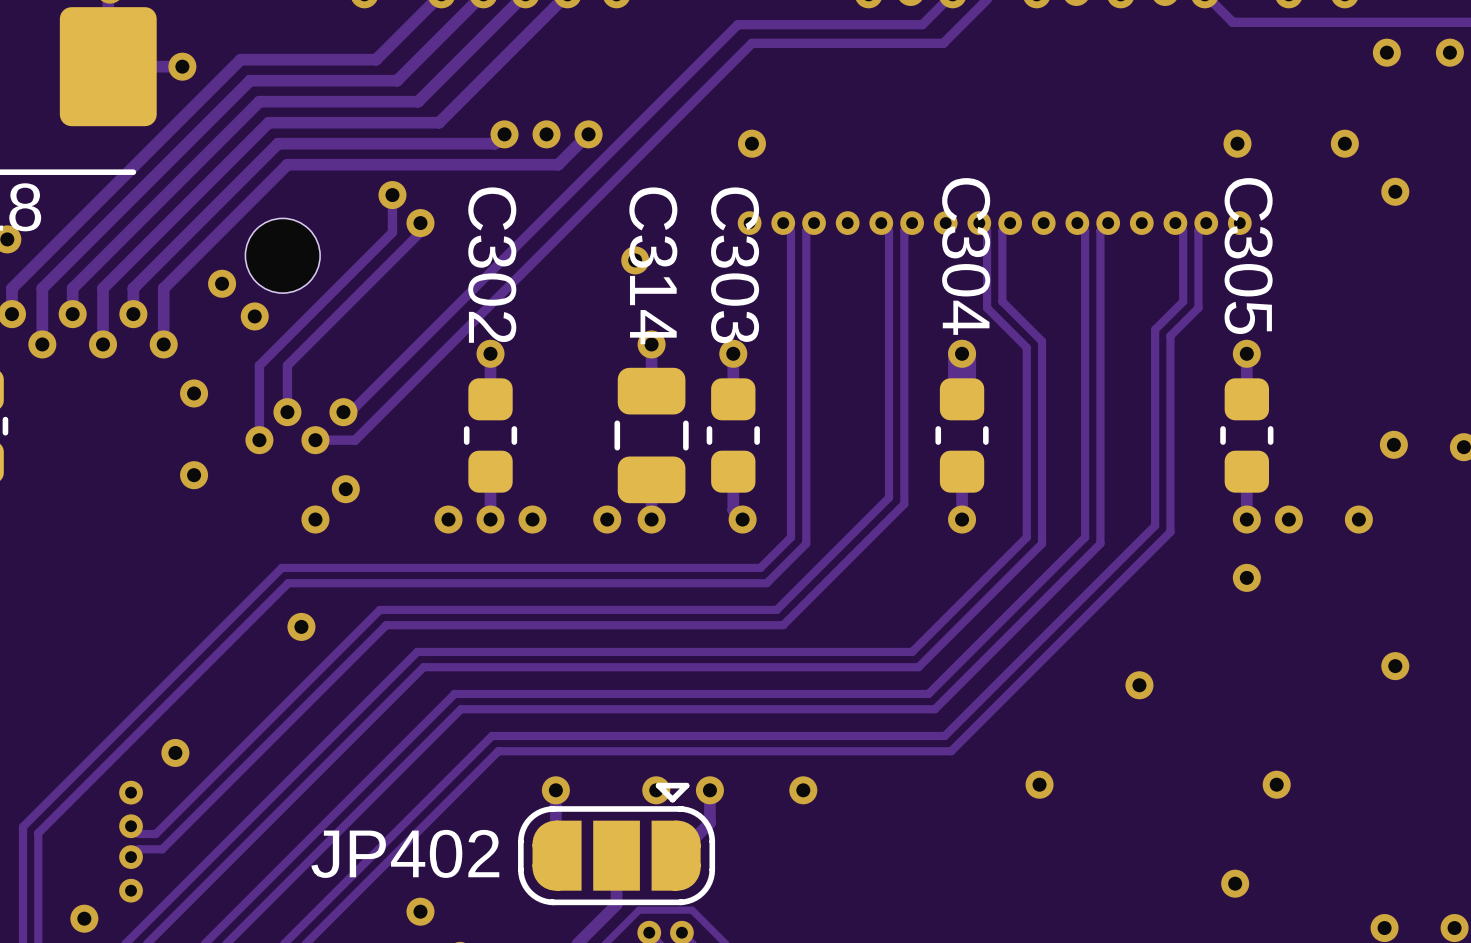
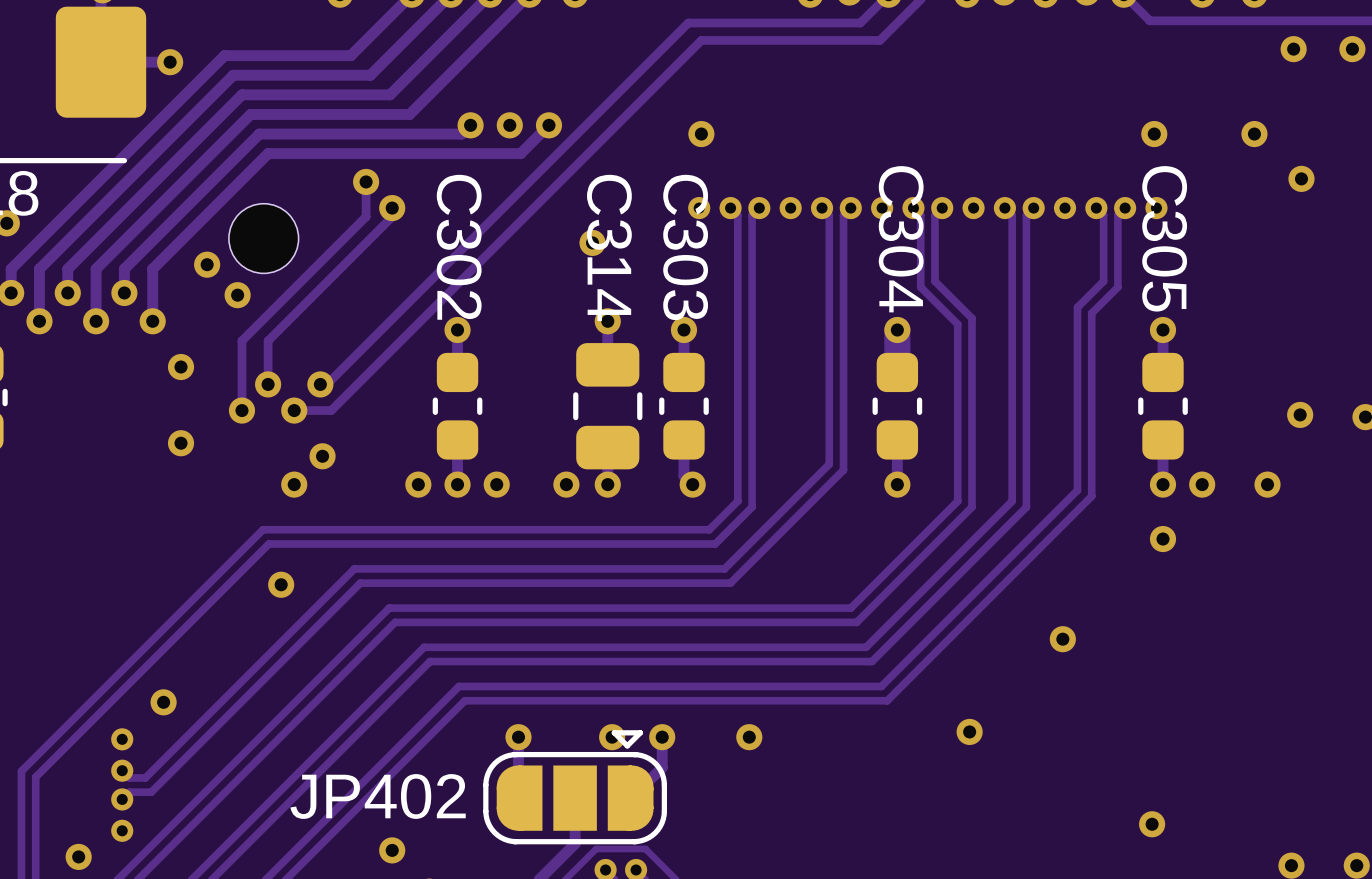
via: (1395, 666) -> none
via: (1276, 784) -> none

